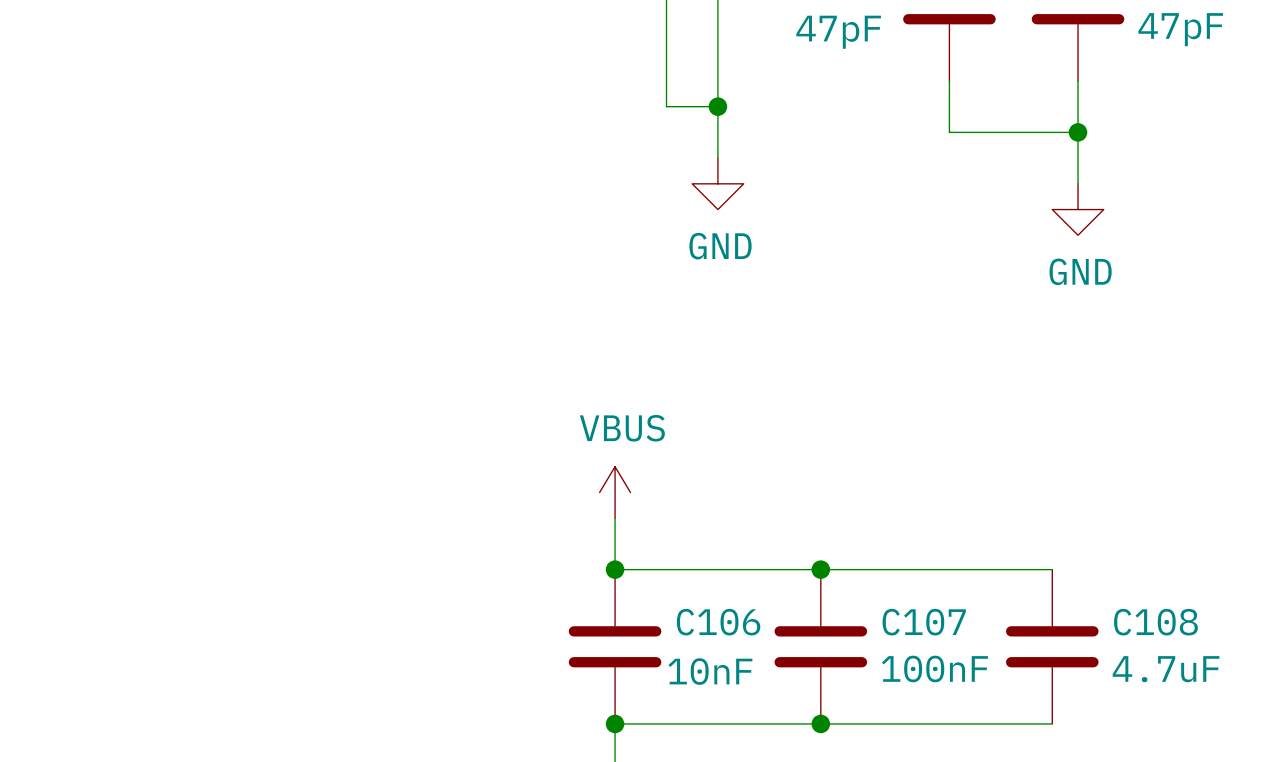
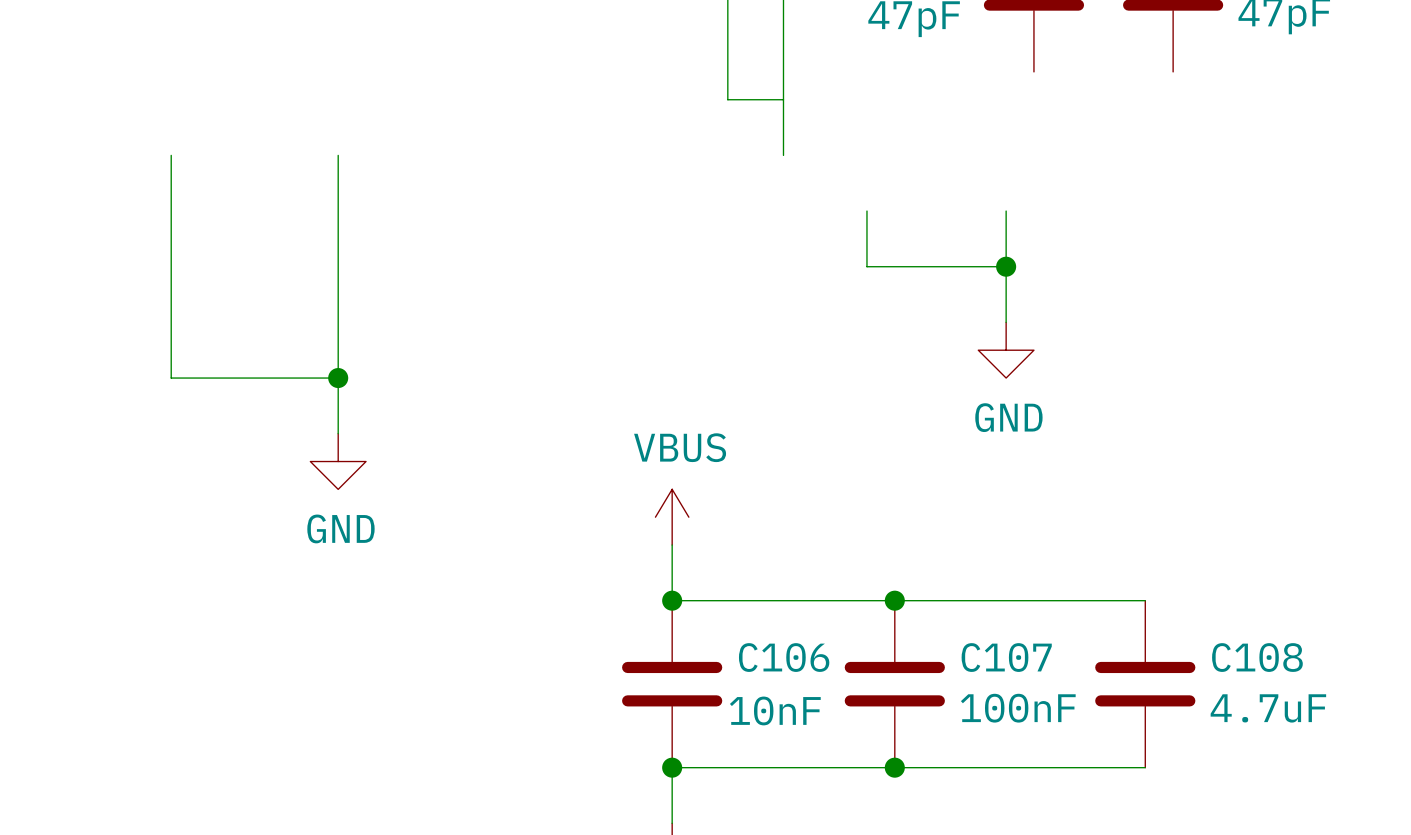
wire: (949, 80) (949, 132) (1078, 132) -> (866, 211) (866, 266) (1006, 266)
wire: (1078, 80) (1078, 183) -> (1006, 211) (1006, 322)
junction: (717, 106) -> none
junction: (1078, 132) -> none
wire: none -> (171, 155) (171, 378) (338, 378)
wire: none -> (338, 155) (338, 433)
power symbol: GND (717, 183) -> none
power symbol: GND (1078, 209) -> none
junction: none -> (1006, 266)
power symbol: none -> GND (1006, 350)
junction: none -> (338, 378)
power symbol: none -> GND (338, 461)

